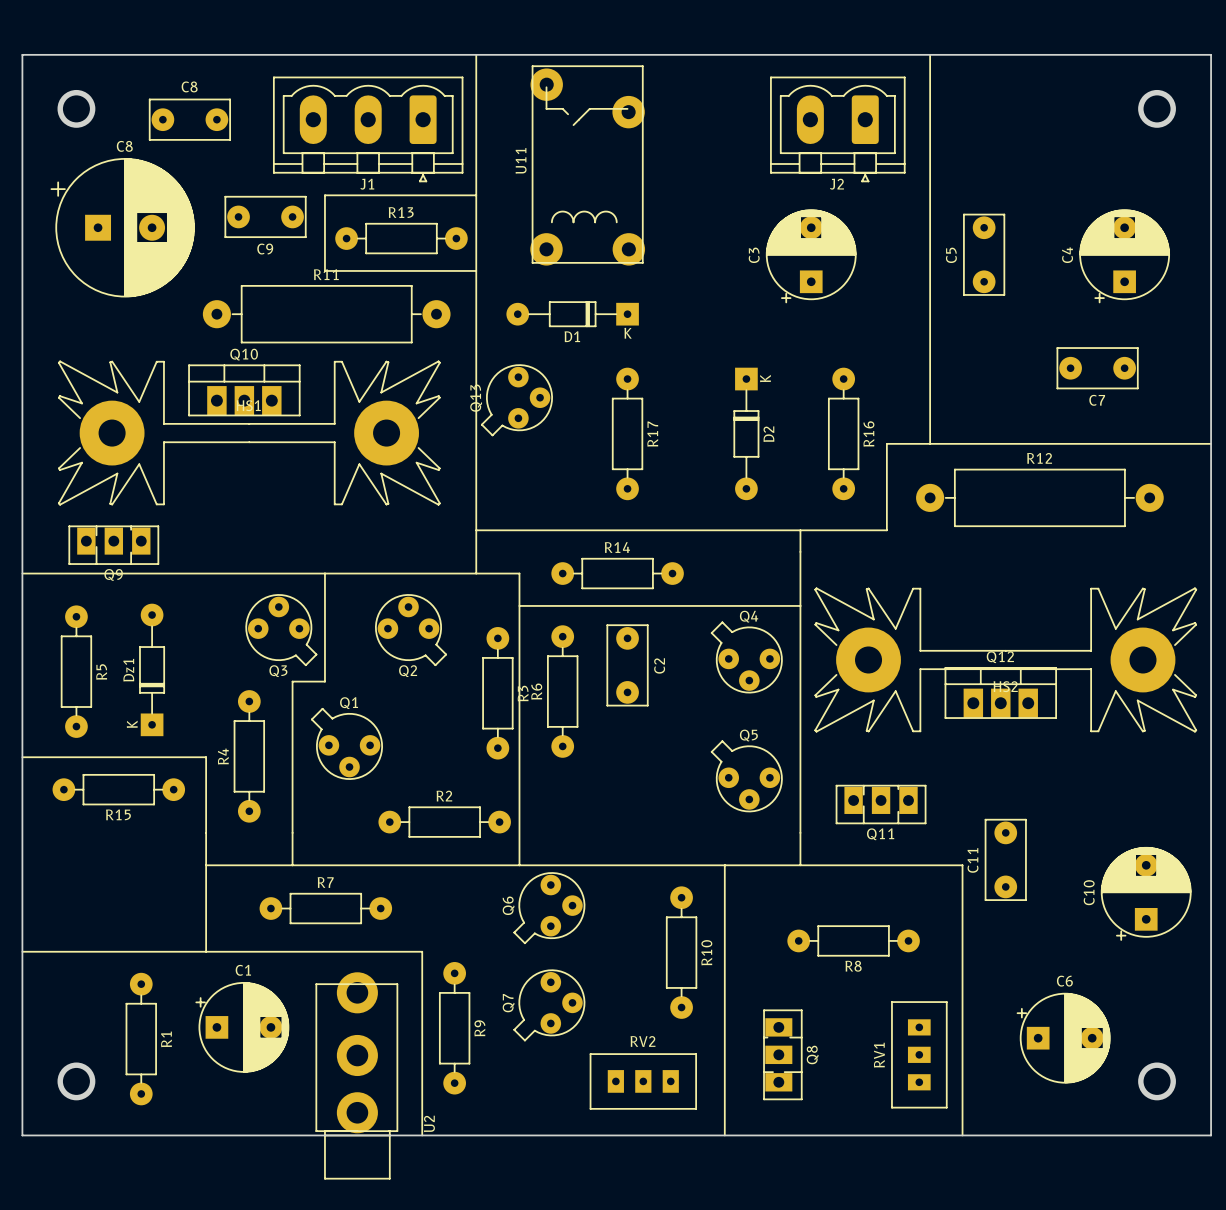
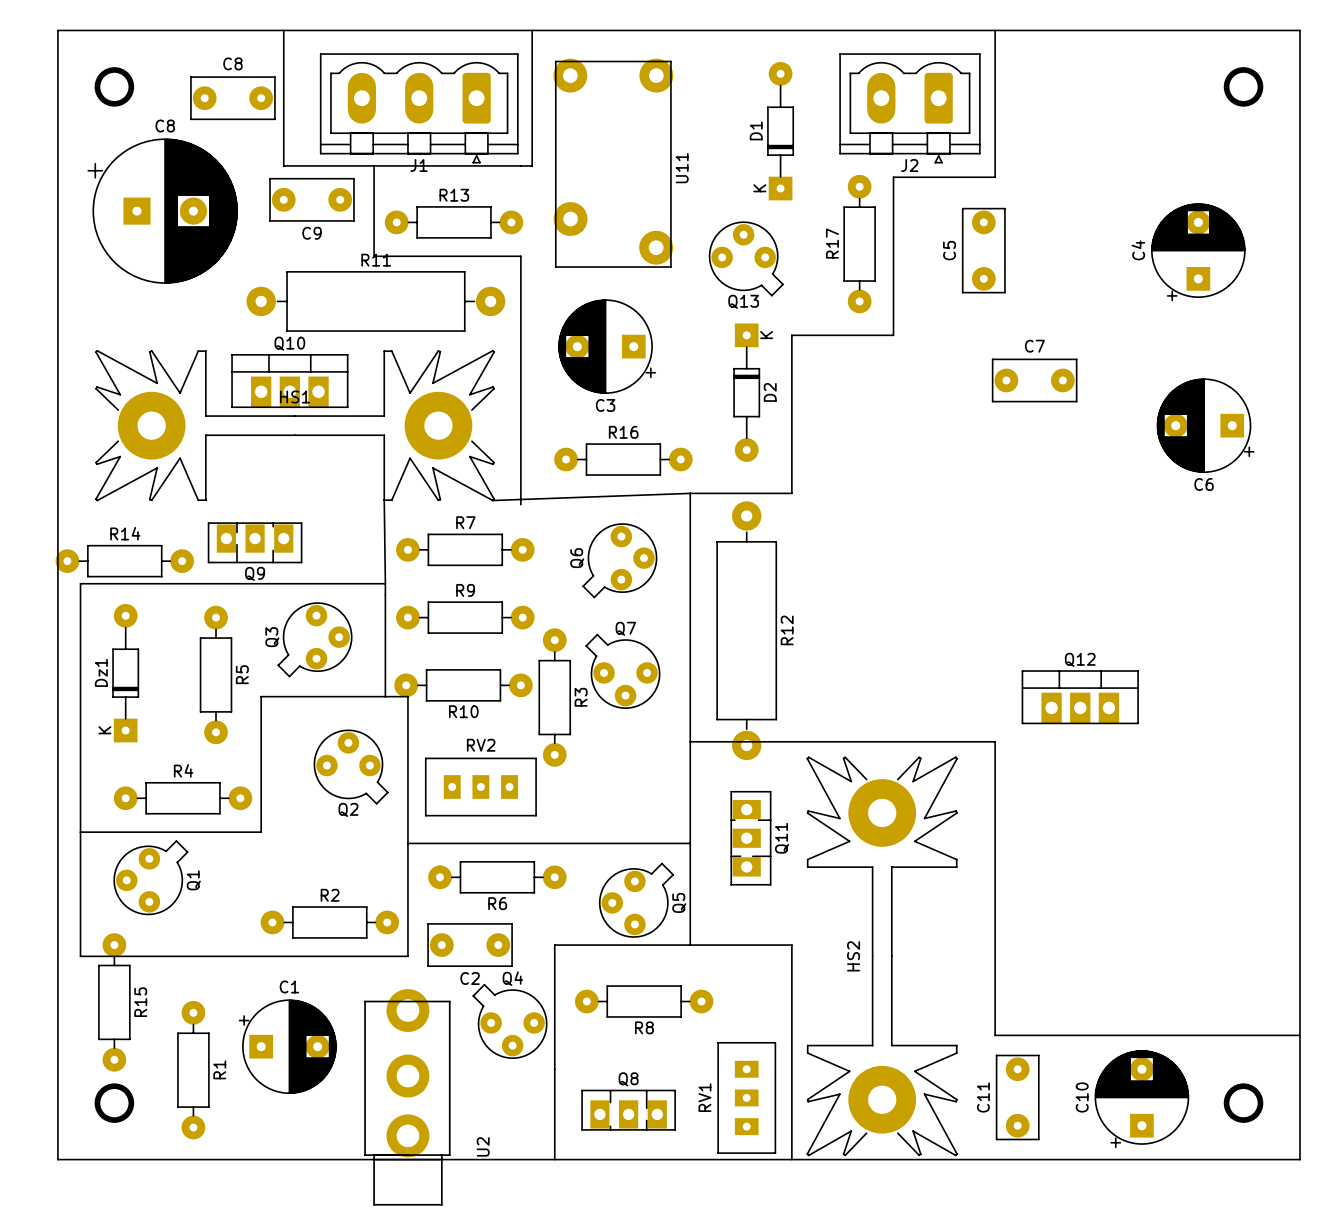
line: none -> (995, 30) (995, 177) (893, 177) (893, 335) (791, 335) (791, 493) (690, 493)
line: (930, 54) (930, 443) -> none
U11 footprint: [530, 65, 646, 266] -> [553, 58, 674, 268]
U11 name position: U11 (521, 160) -> U11 (682, 168)
line: (476, 184) (476, 573) -> (532, 165) (283, 165) (283, 30)
line: (324, 195) (476, 195) -> (374, 177) (374, 165)
C5 position: (984, 254) -> (983, 250)
C3 rotation: 0° (811, 256) -> 90° counterclockwise (607, 346)
C3 position: (811, 256) -> (607, 346)
C4 position: (1124, 256) -> (1198, 252)
line: (465, 270) (476, 270) -> (520, 256) (520, 504)
D1 rotation: 0° (572, 314) -> 90° clockwise (780, 131)
D1 position: (572, 314) -> (780, 131)
C7 position: (1097, 368) -> (1034, 380)
Q13 rotation: 0° (516, 400) -> 90° counterclockwise (746, 258)
Q13 position: (516, 400) -> (746, 258)
C7 name position: C7 (1097, 400) -> C7 (1034, 346)
R17 position: (627, 433) -> (859, 244)
D2 position: (746, 433) -> (746, 392)
R16 rotation: 0° (843, 433) -> 90° clockwise (623, 459)
R16 position: (843, 433) -> (623, 459)
R16 name position: R16 (868, 433) -> R16 (623, 432)
R17 name position: R17 (652, 434) -> R17 (832, 243)
line: (1211, 443) (886, 443) (886, 530) (476, 530) -> none
line: none -> (690, 493) (690, 945)
line: none -> (690, 493) (492, 500)
R12 rotation: 0° (1039, 497) -> 90° clockwise (746, 630)
R12 position: (1039, 497) -> (746, 630)
line: none -> (384, 500) (385, 583)
line: (800, 530) (800, 865) -> none
Q9 position: (113, 545) -> (255, 542)
line: (22, 573) (519, 573) (519, 865) -> none
line: (324, 573) (324, 681) (292, 681) (292, 865) -> none
R14 position: (617, 573) -> (124, 561)
line: none -> (385, 583) (385, 696)
line: none -> (385, 583) (80, 583) (80, 956) (407, 956) (407, 696) (261, 696) (261, 832) (80, 832)
line: (519, 605) (800, 605) -> none
Q3 rotation: 0° (281, 630) -> 90° clockwise (315, 639)
Q2 position: (411, 630) -> (351, 767)
Q4 position: (746, 657) -> (510, 1021)
HS2 rotation: 0° (1005, 659) -> 90° clockwise (882, 956)
HS2 position: (1005, 659) -> (882, 956)
C2 rotation: 0° (627, 665) -> 90° clockwise (470, 945)
C2 position: (627, 665) -> (470, 945)
Dz1 position: (152, 669) -> (125, 673)
R5 position: (76, 671) -> (216, 674)
R6 name position: R6 (536, 691) -> R6 (497, 903)
R6 rotation: 0° (562, 691) -> 90° clockwise (497, 877)
R6 position: (562, 691) -> (497, 877)
line: none -> (690, 741) (995, 741) (995, 1035) (1299, 1035)
Q1 rotation: 0° (346, 743) -> 90° clockwise (150, 877)
Q1 position: (346, 743) -> (150, 877)
R4 rotation: 0° (249, 756) -> 90° clockwise (183, 798)
R4 position: (249, 756) -> (183, 798)
line: (22, 757) (206, 757) (206, 951) -> none
Q5 rotation: 0° (746, 776) -> 90° clockwise (636, 900)
Q5 position: (746, 776) -> (636, 900)
R15 rotation: 0° (118, 789) -> 90° clockwise (114, 1002)
R15 position: (118, 789) -> (114, 1002)
Q11 rotation: 0° (881, 804) -> 90° counterclockwise (750, 838)
Q11 position: (881, 804) -> (750, 838)
R15 name position: R15 (118, 814) -> R15 (140, 1002)
R2 position: (444, 822) -> (329, 922)
line: none -> (407, 843) (690, 843)
C11 position: (1005, 859) -> (1017, 1097)
line: (206, 865) (962, 865) (962, 1135) -> none
line: (724, 865) (724, 930) -> (554, 1159) (554, 945) (791, 945)
C10 position: (1146, 893) -> (1141, 1099)
R7 position: (325, 908) -> (465, 549)
Q6 position: (549, 908) -> (619, 560)
R8 position: (853, 940) -> (644, 1001)
line: (22, 951) (422, 951) (422, 1135) -> none
R10 rotation: 0° (681, 952) -> 90° clockwise (463, 685)
R10 position: (681, 952) -> (463, 685)
Q7 rotation: 0° (549, 1005) -> 90° clockwise (622, 671)
Q7 position: (549, 1005) -> (622, 671)
R9 rotation: 0° (454, 1028) -> 90° clockwise (465, 617)
R9 position: (454, 1028) -> (465, 617)
R9 name position: R9 (479, 1028) -> R9 (465, 590)
C6 rotation: 0° (1063, 1038) -> 180° (1205, 425)
C6 position: (1063, 1038) -> (1205, 425)
R1 position: (141, 1039) -> (193, 1070)
Q8 rotation: 0° (782, 1054) -> 90° counterclockwise (628, 1110)
Q8 position: (782, 1054) -> (628, 1110)
RV1 position: (919, 1054) -> (746, 1097)
RV2 position: (643, 1081) -> (480, 787)

